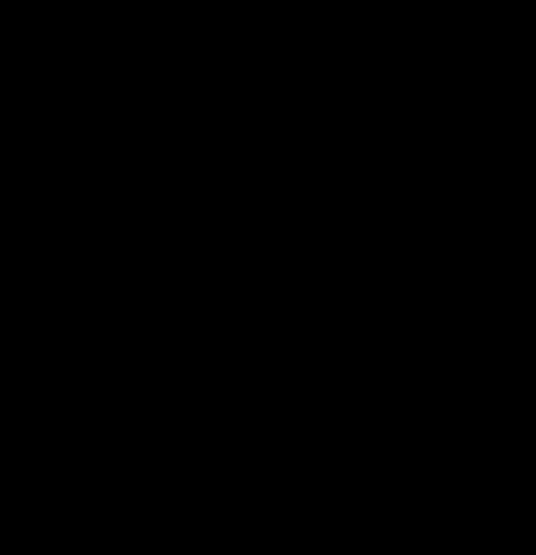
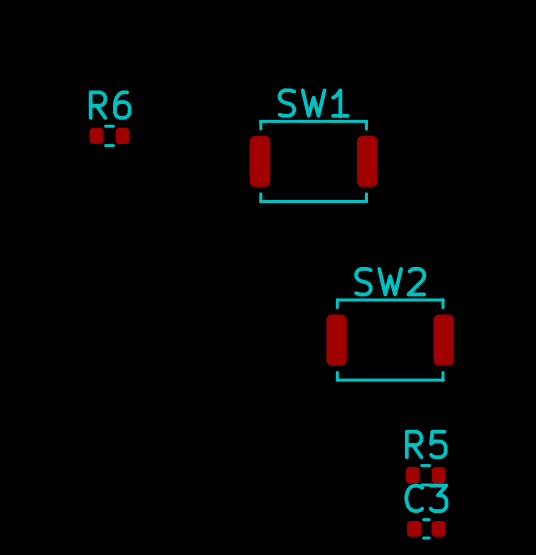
R6: none -> (109, 135)
SW1: none -> (313, 161)
SW2: none -> (390, 340)
R5: none -> (425, 475)
C3: none -> (426, 528)

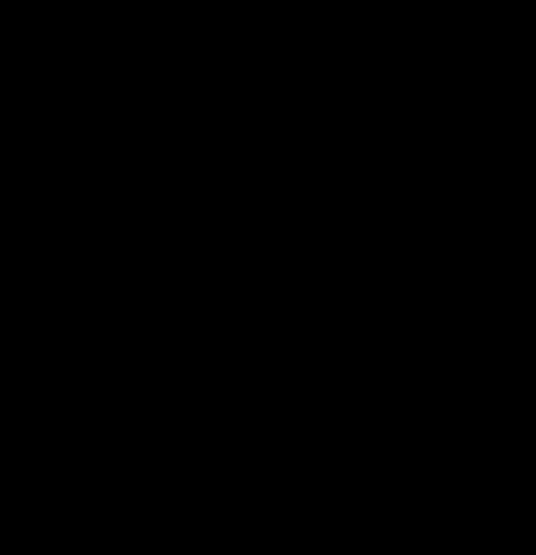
R6: (109, 135) -> none
SW1: (313, 161) -> none
SW2: (390, 340) -> none
R5: (425, 475) -> none
C3: (426, 528) -> none

